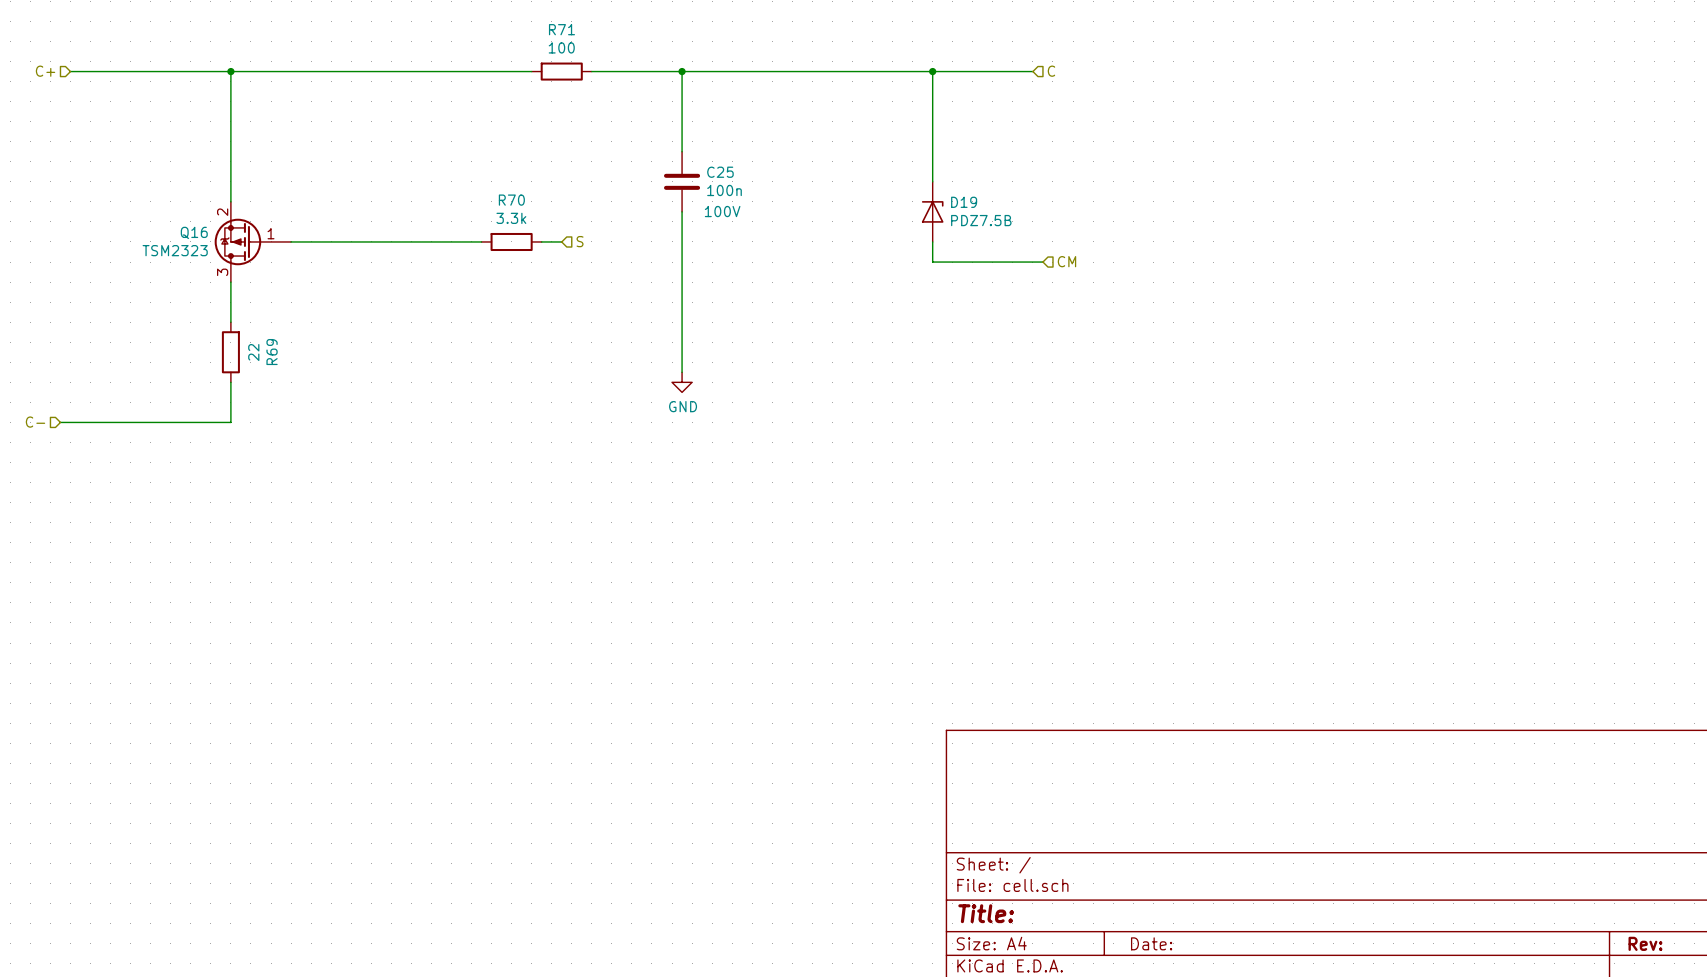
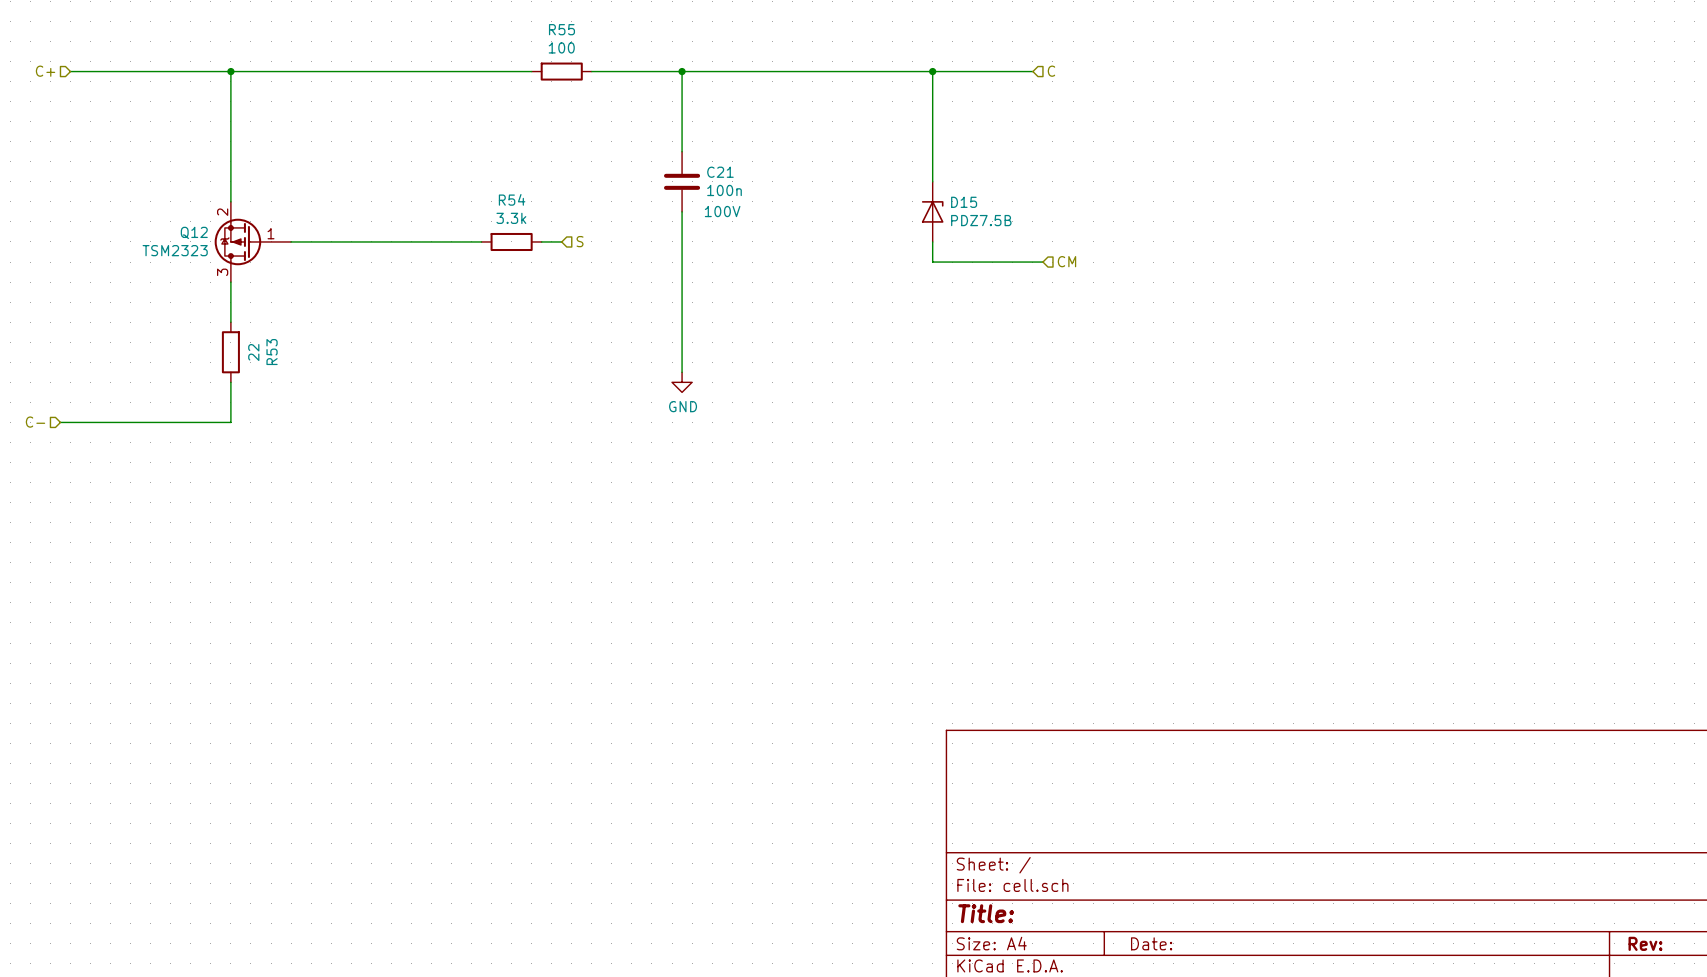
R71 name: R71 (561, 29) -> R55 (561, 29)
C25 name: C25 (720, 172) -> C21 (720, 172)
R70 name: R70 (511, 200) -> R54 (512, 199)
D19 name: D19 (964, 202) -> D15 (964, 202)
Q16 name: Q16 (194, 232) -> Q12 (194, 232)
R69 name: R69 (272, 352) -> R53 (272, 352)

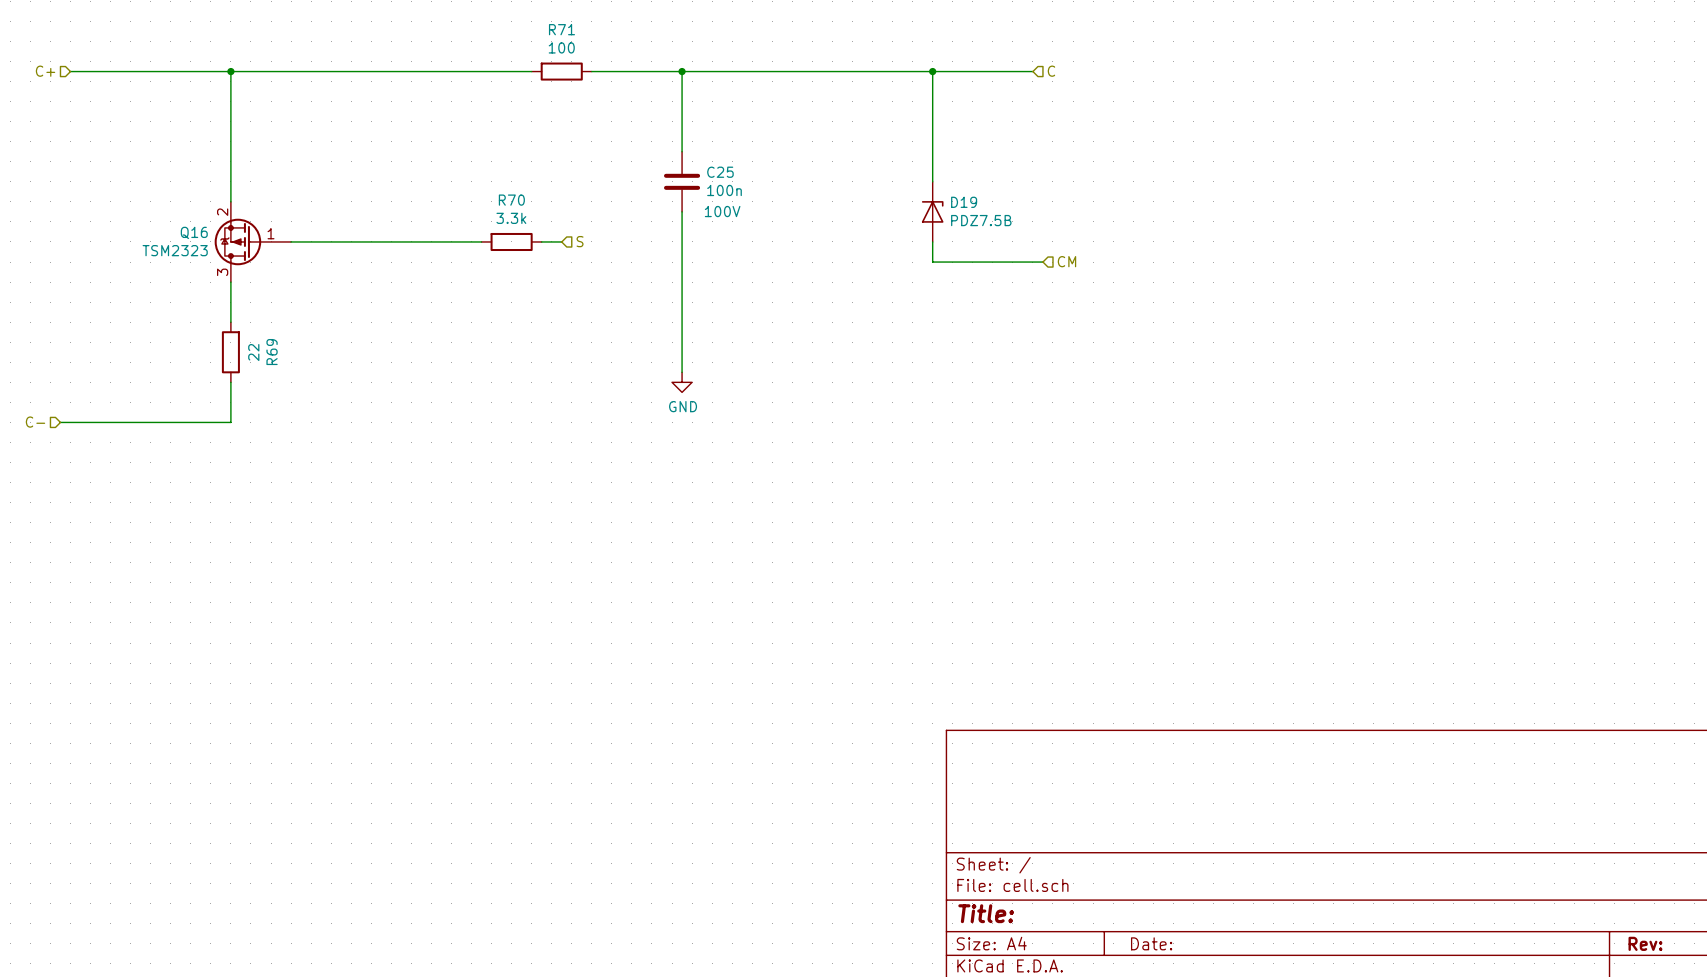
R55 name: R55 (561, 29) -> R71 (561, 29)
C21 name: C21 (720, 172) -> C25 (720, 172)
R54 name: R54 (512, 199) -> R70 (511, 200)
D15 name: D15 (964, 202) -> D19 (964, 202)
Q12 name: Q12 (194, 232) -> Q16 (194, 232)
R53 name: R53 (272, 352) -> R69 (272, 352)

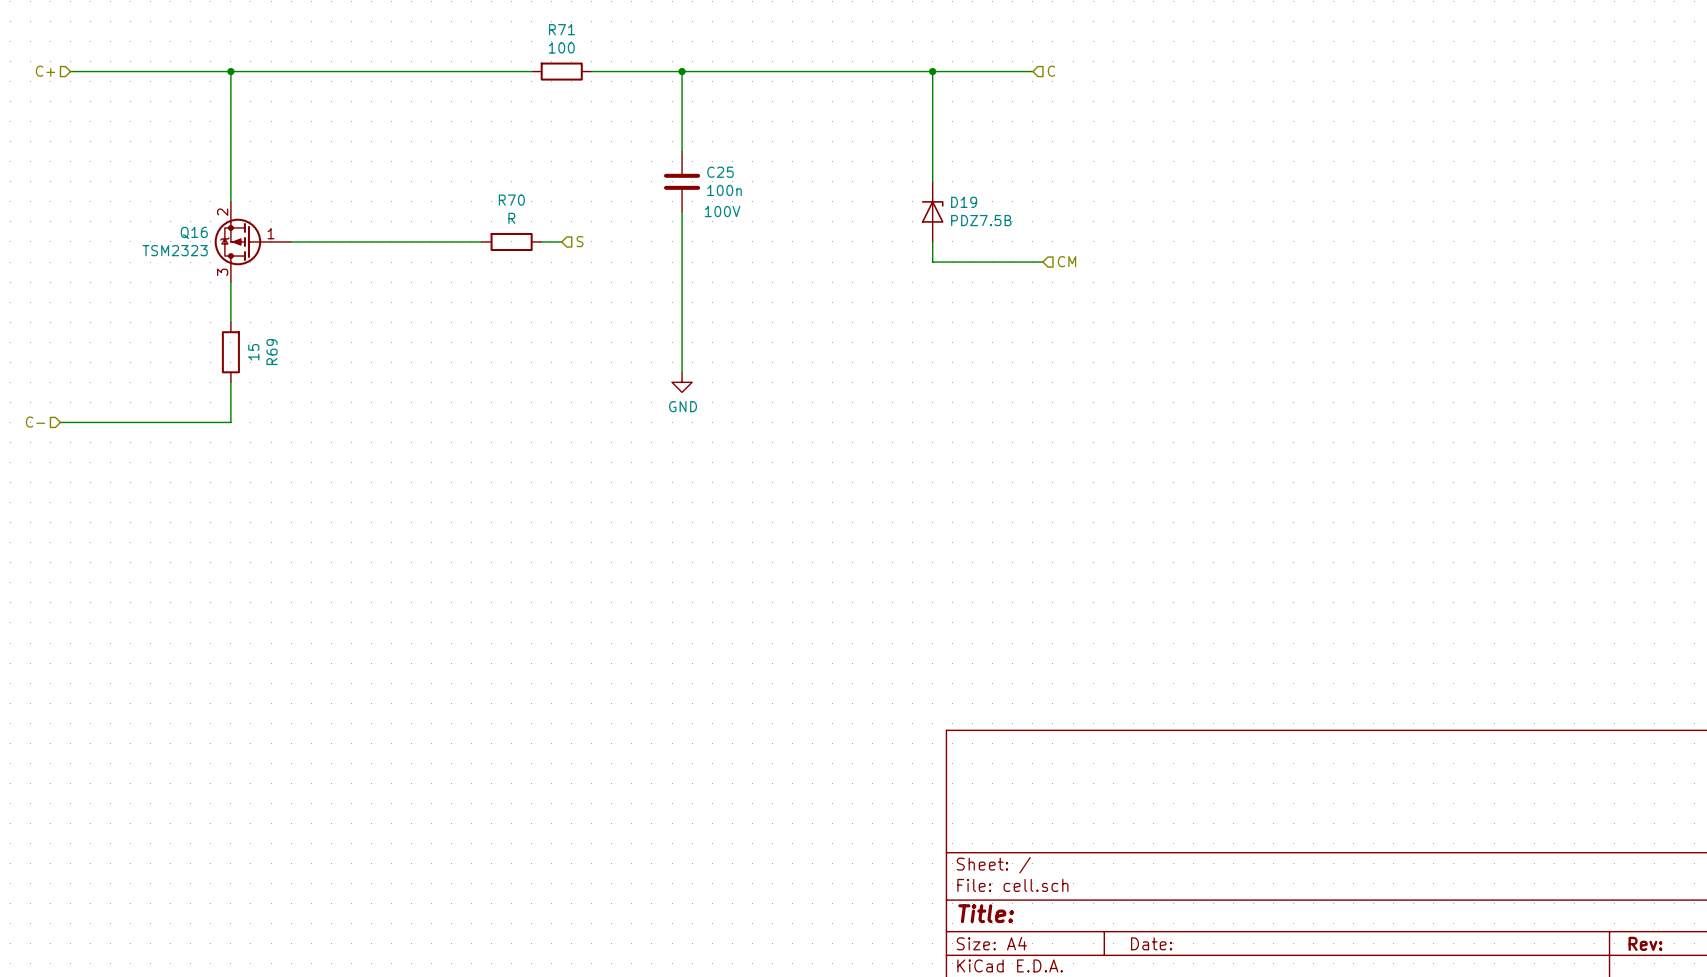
R70 value: 3.3k (511, 218) -> R (511, 218)
R69 value: 22 (253, 352) -> 15 (253, 352)

